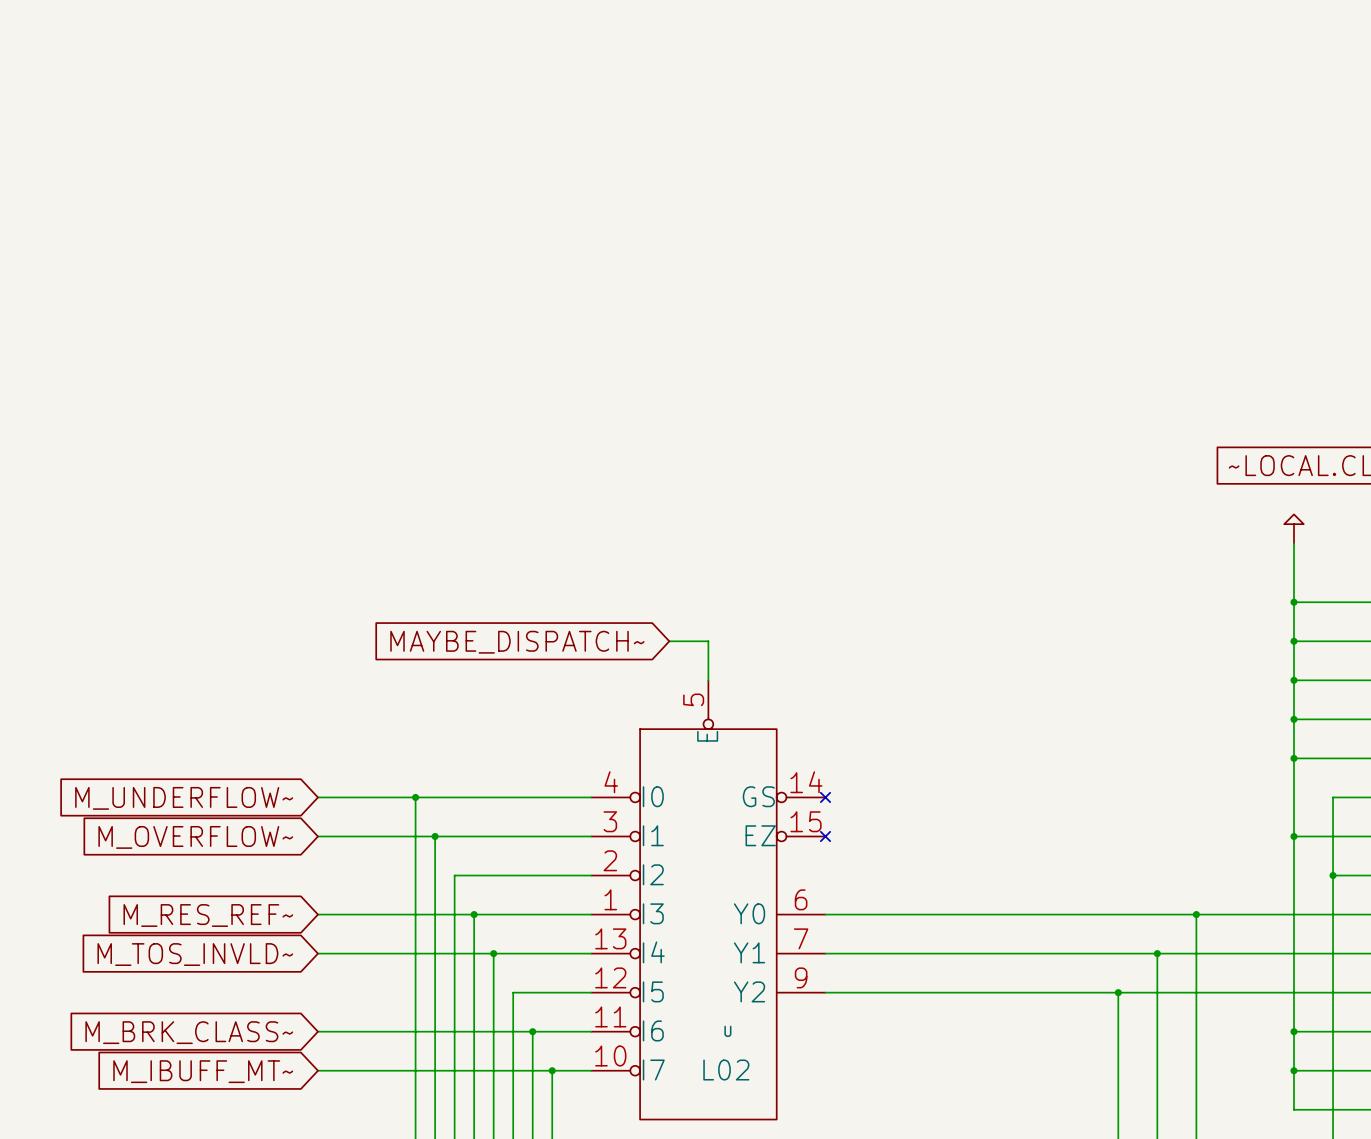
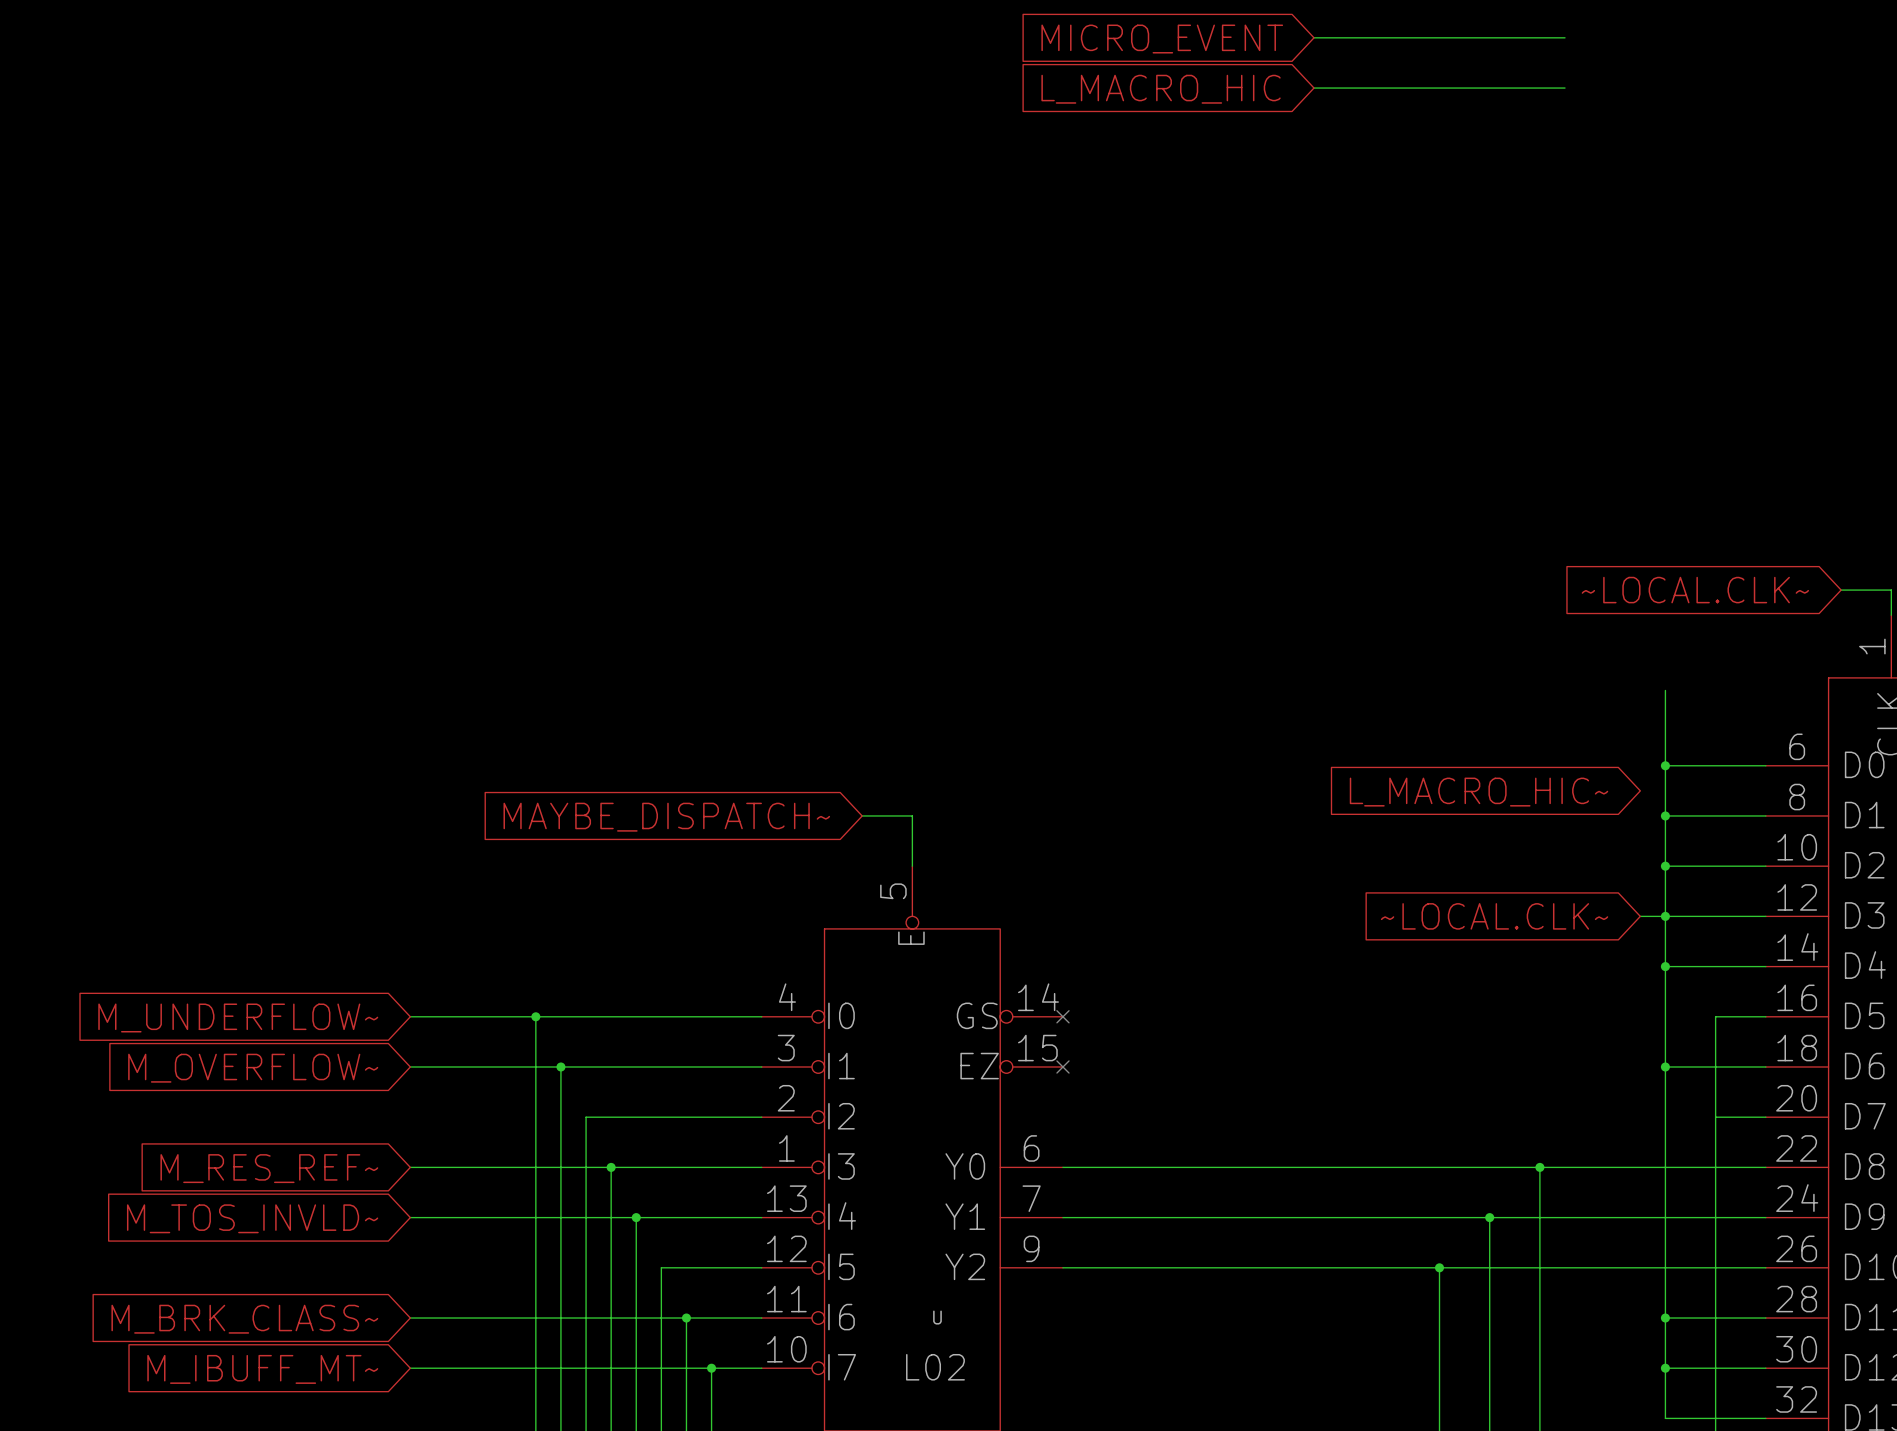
wire: none -> (1314, 37) (1565, 37)
global label: none -> MICRO_EVENT (1162, 39)
wire: none -> (1314, 88) (1565, 88)
global label: none -> L_MACRO_HIC (1161, 89)
power symbol: (1293, 528) -> none
global label: none -> L_MACRO_HIC~ (1479, 792)
global label: none -> ~LOCAL.CLK~ (1494, 916)
wire: none -> (1640, 916) (1665, 916)
junction: (1333, 875) -> none

